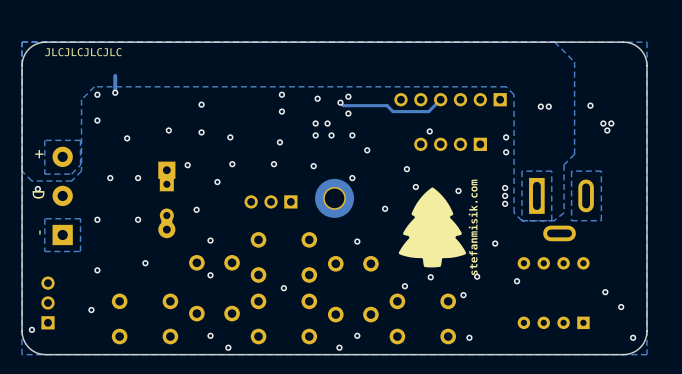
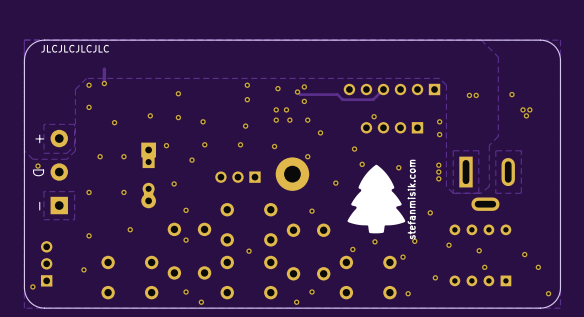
via: none -> (479, 250)
via: none -> (484, 267)
via: none -> (435, 277)

